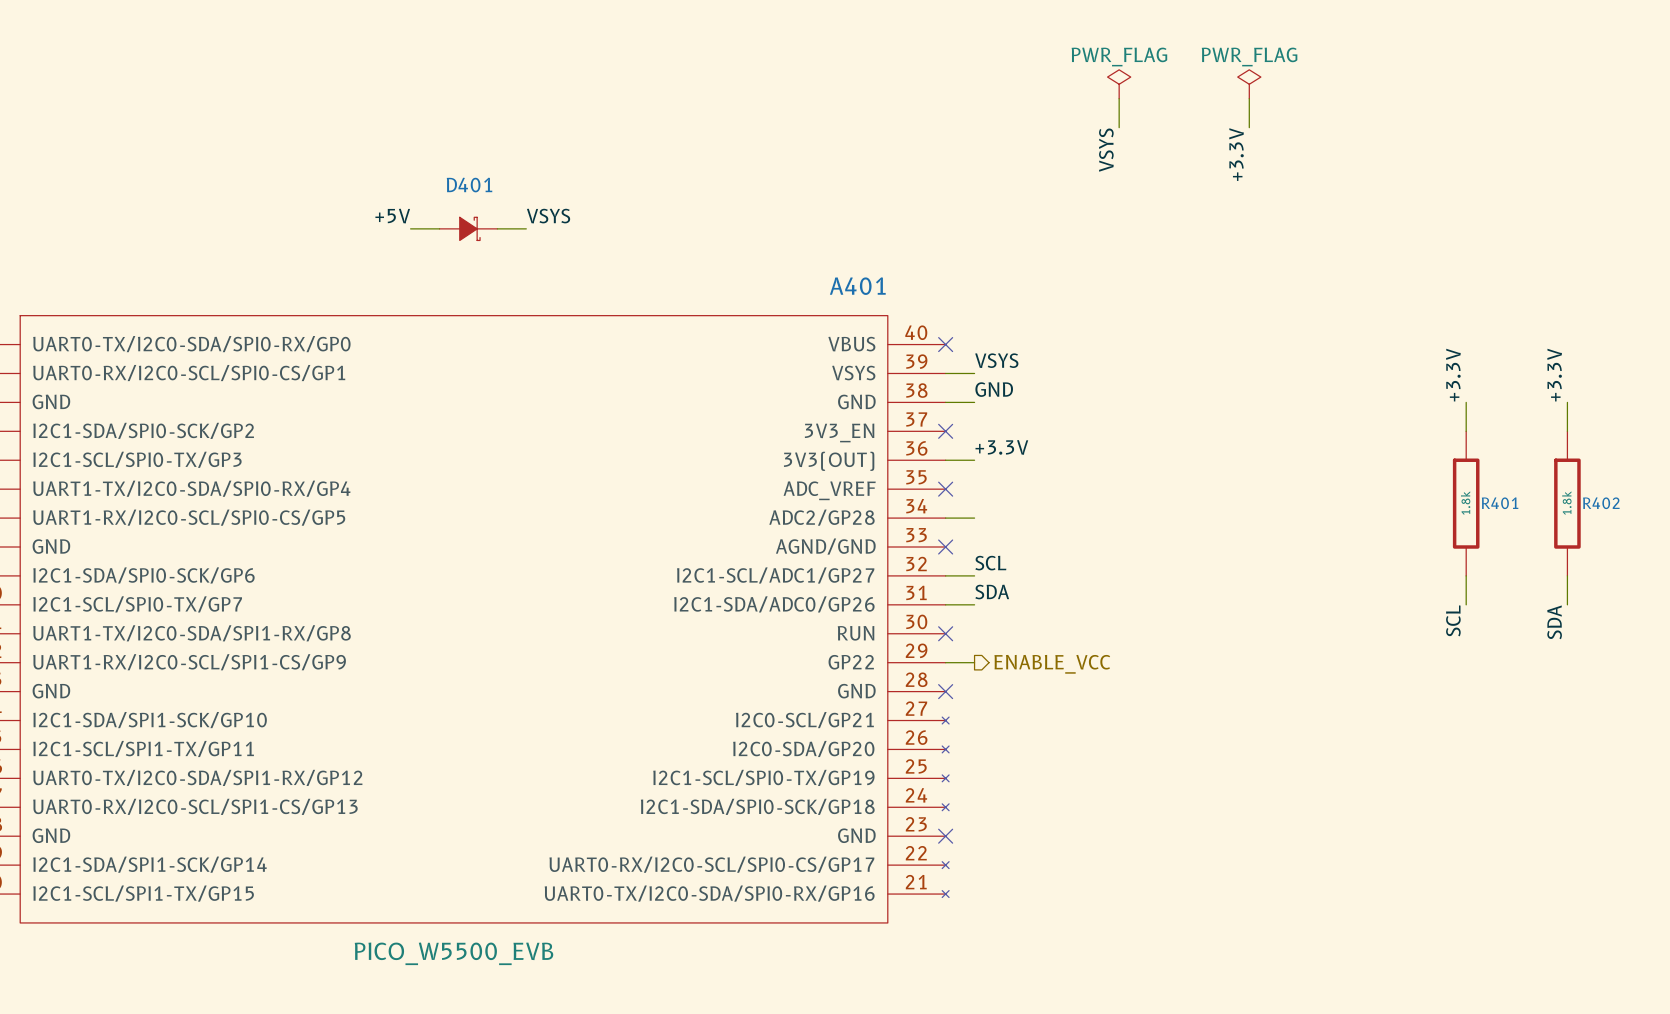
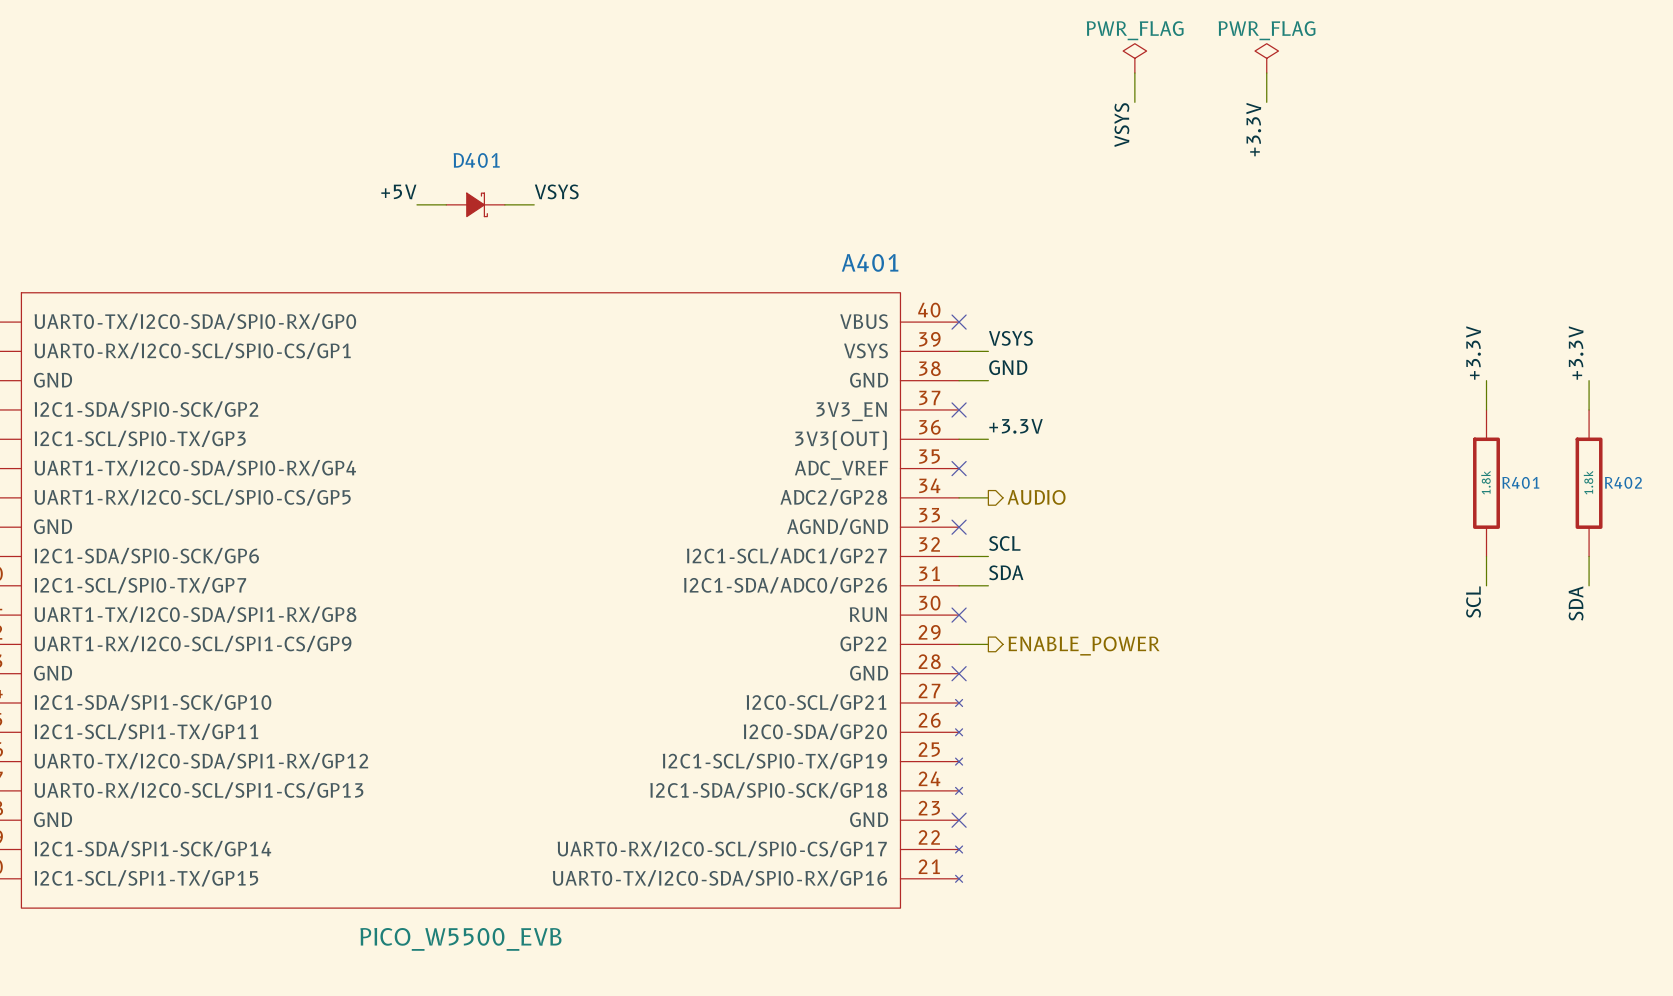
hierarchical label: none -> AUDIO (1036, 497)
hierarchical label: ENABLE_VCC (1052, 664) -> ENABLE_POWER (1084, 646)

